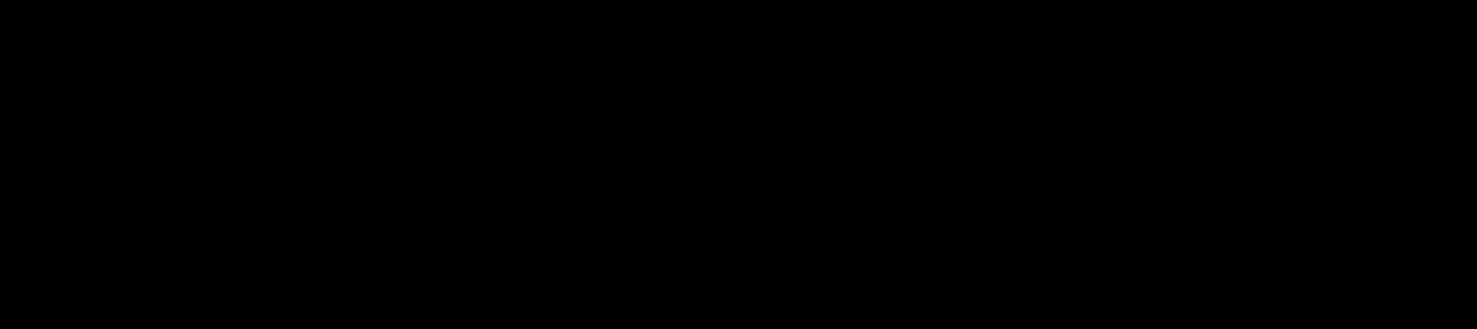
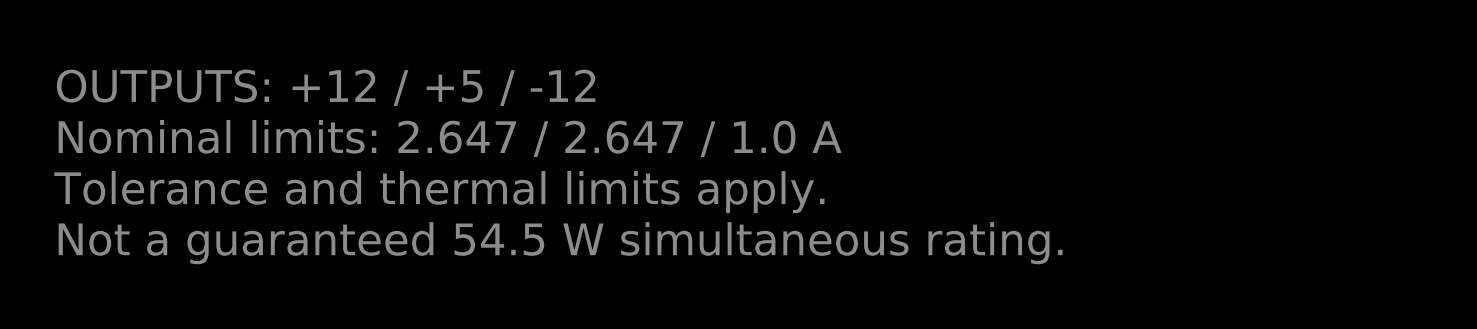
text: none -> OUTPUTS: +12 / +5 / -12 (326, 87)
text: none -> Nominal limits: 2.647 / 2.647 / 1.0 A (450, 138)
text: none -> Tolerance and thermal limits apply. (439, 192)
text: none -> Not a guaranteed 54.5 W simultaneous rating. (560, 243)

